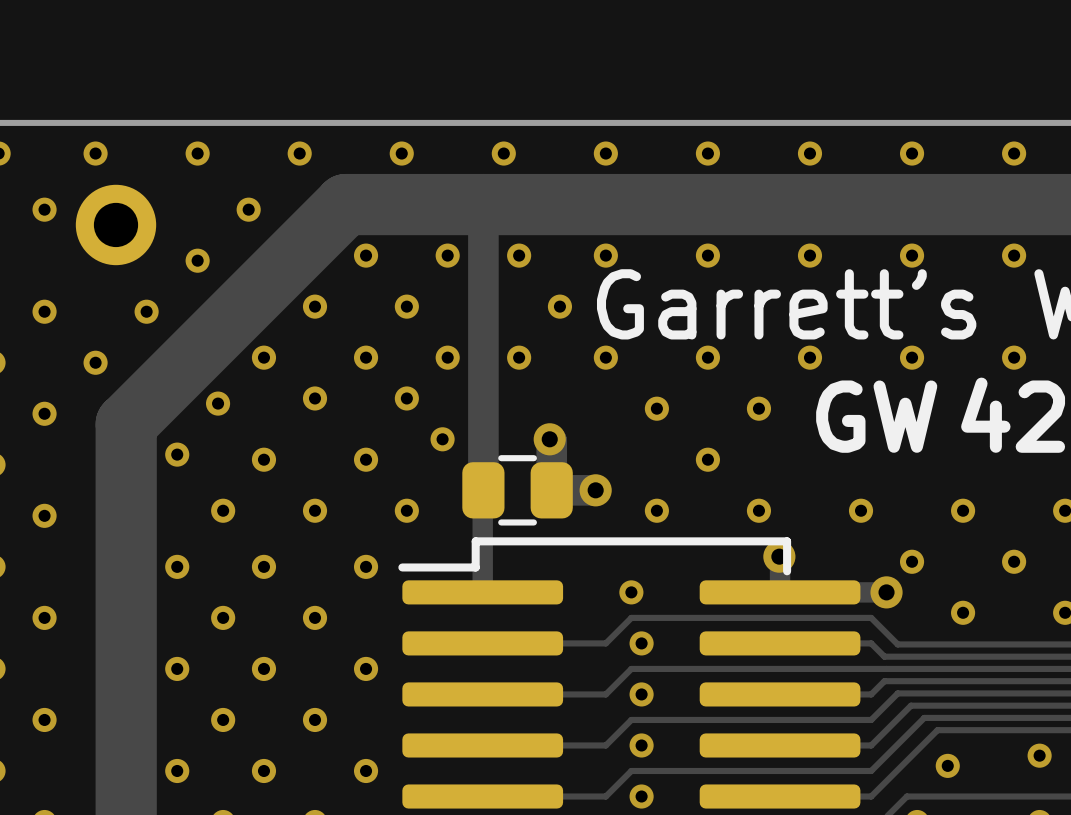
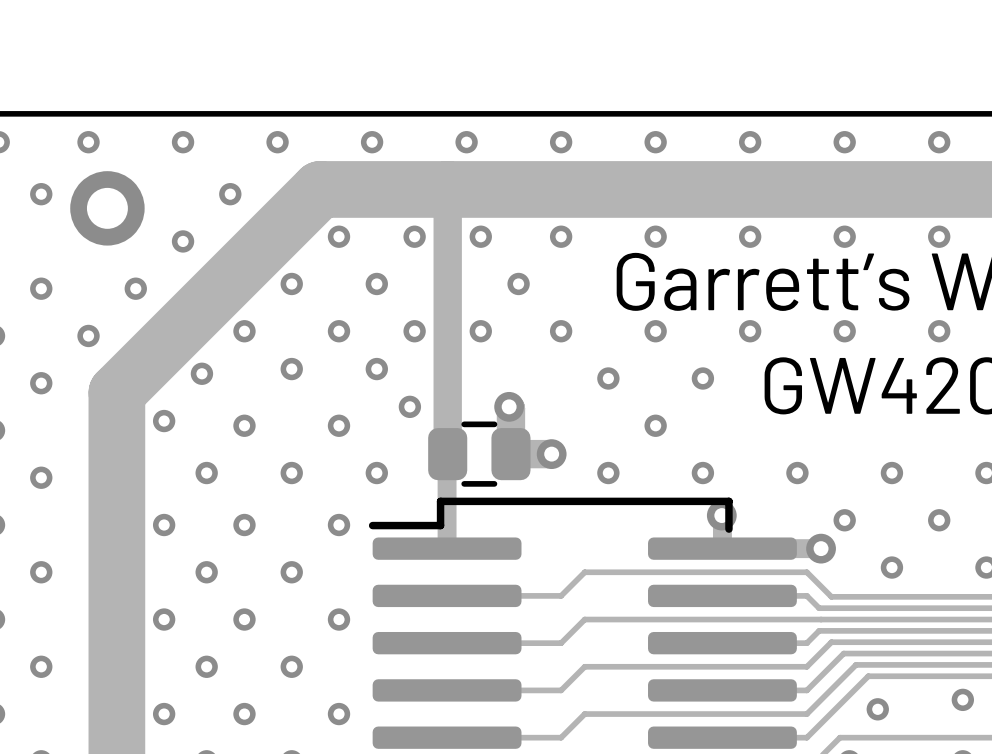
via: (631, 592) -> none
via: (641, 643) -> none
via: (641, 694) -> none
via: (641, 745) -> none
via: (641, 796) -> none

